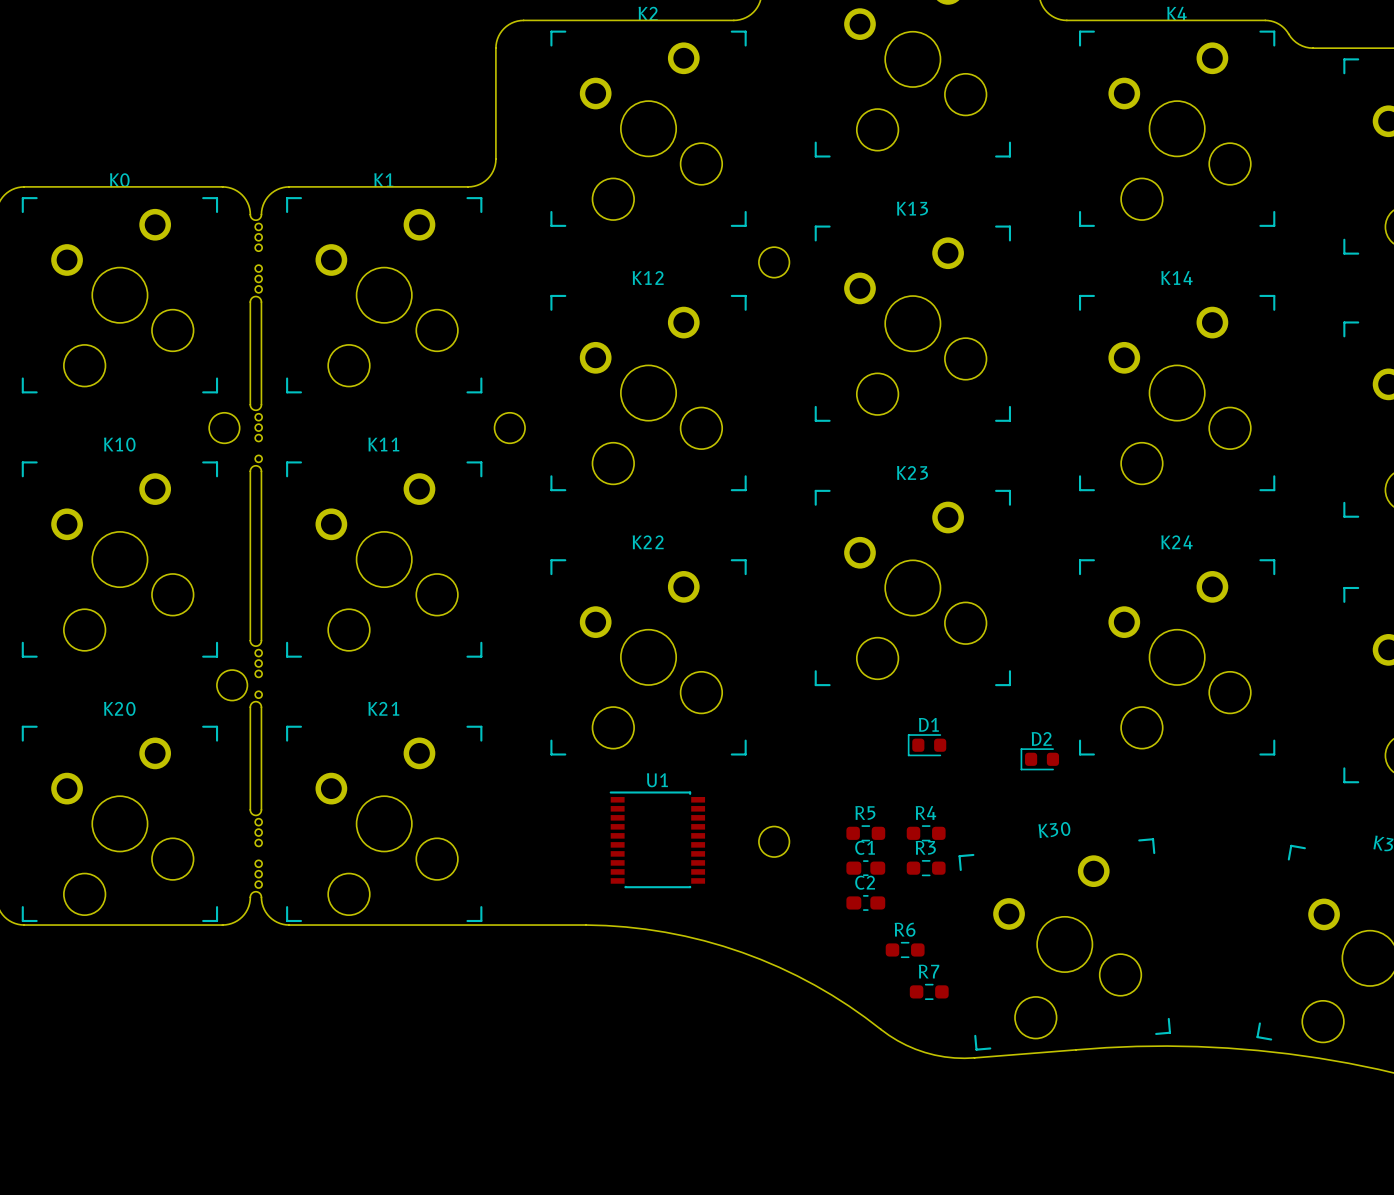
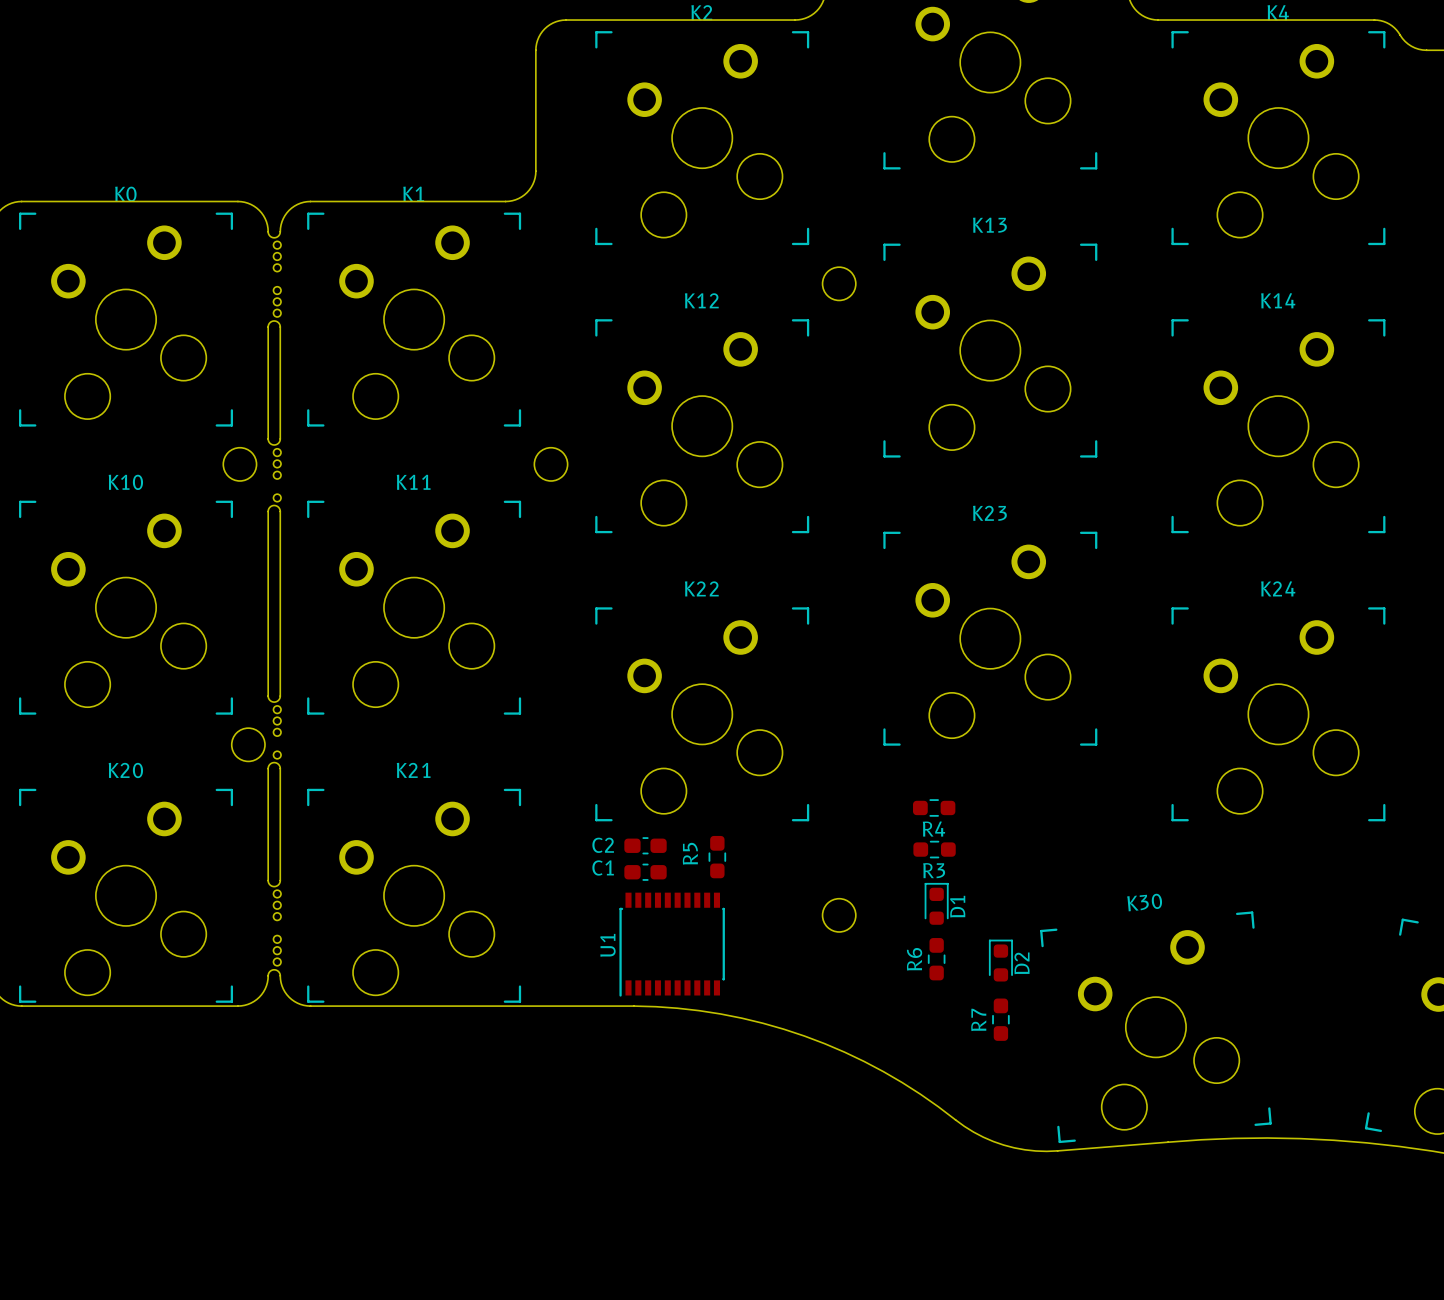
D1 rotation: 0° (927, 745) -> 90° clockwise (936, 903)
D1 position: (927, 745) -> (936, 903)
D2 rotation: 0° (1039, 759) -> 90° clockwise (1000, 960)
D2 position: (1039, 759) -> (1000, 960)
R4 name position: R4 (925, 812) -> R4 (933, 829)
R5 name position: R5 (865, 813) -> R5 (690, 853)
R5 rotation: 0° (865, 833) -> 90° clockwise (717, 857)
R5 position: (865, 833) -> (717, 857)
R4 position: (926, 833) -> (934, 807)
U1 rotation: 0° (657, 839) -> 90° counterclockwise (672, 944)
C1 name position: C1 (865, 847) -> C1 (603, 867)
R3 name position: R3 (925, 847) -> R3 (934, 870)
C1 position: (865, 868) -> (645, 872)
R3 position: (926, 868) -> (934, 849)
C2 name position: C2 (865, 882) -> C2 (603, 845)
C2 position: (865, 902) -> (645, 845)
R6 name position: R6 (905, 929) -> R6 (914, 959)
R6 rotation: 0° (905, 949) -> 90° clockwise (936, 959)
R6 position: (905, 949) -> (936, 959)
R7 name position: R7 (929, 971) -> R7 (978, 1019)
R7 rotation: 0° (929, 991) -> 90° clockwise (1000, 1019)
R7 position: (929, 991) -> (1000, 1019)

